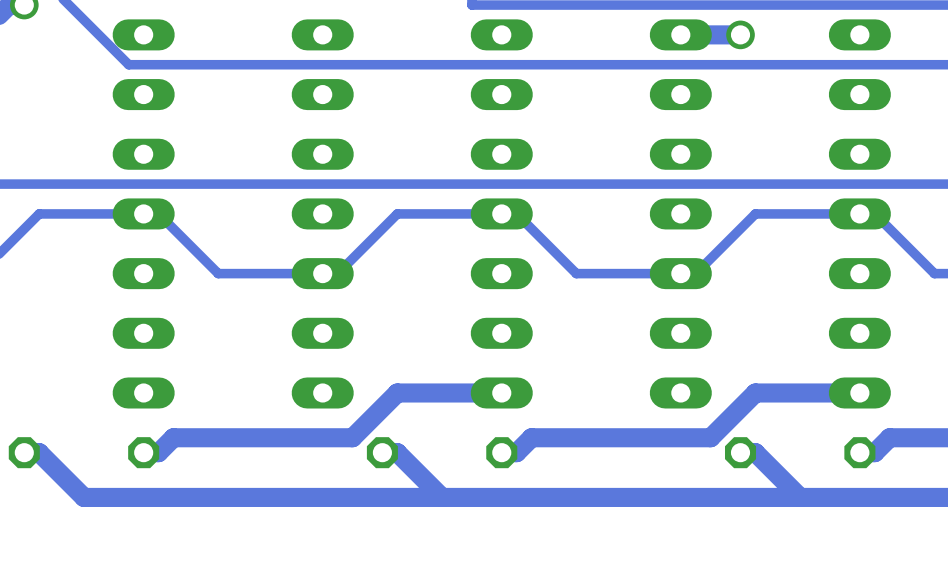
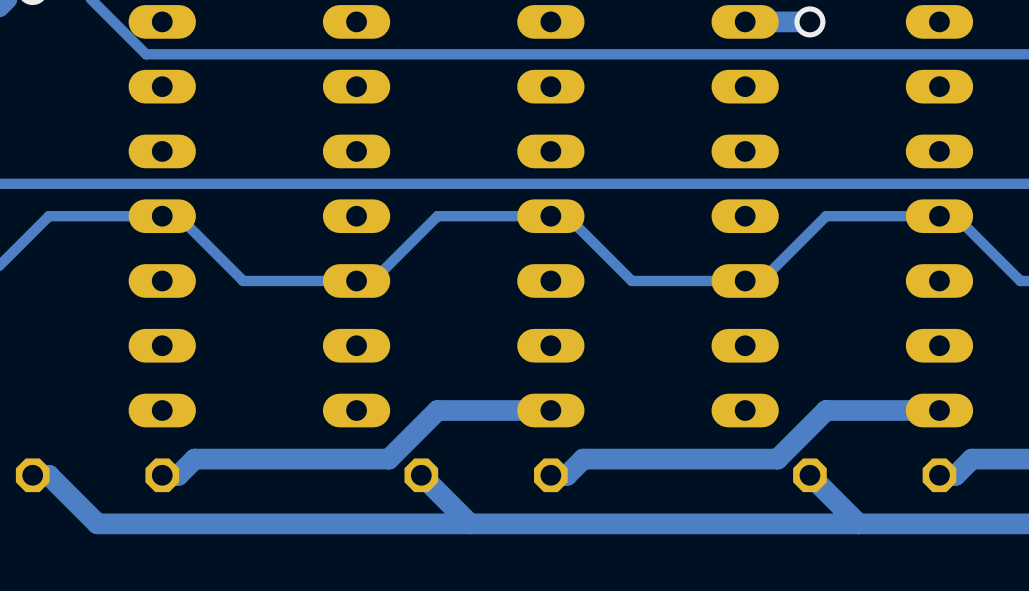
track: (382, 452) (397, 452) (442, 497) -> (421, 475) (469, 523)
track: (740, 452) (755, 452) (800, 497) -> (809, 475) (858, 523)

